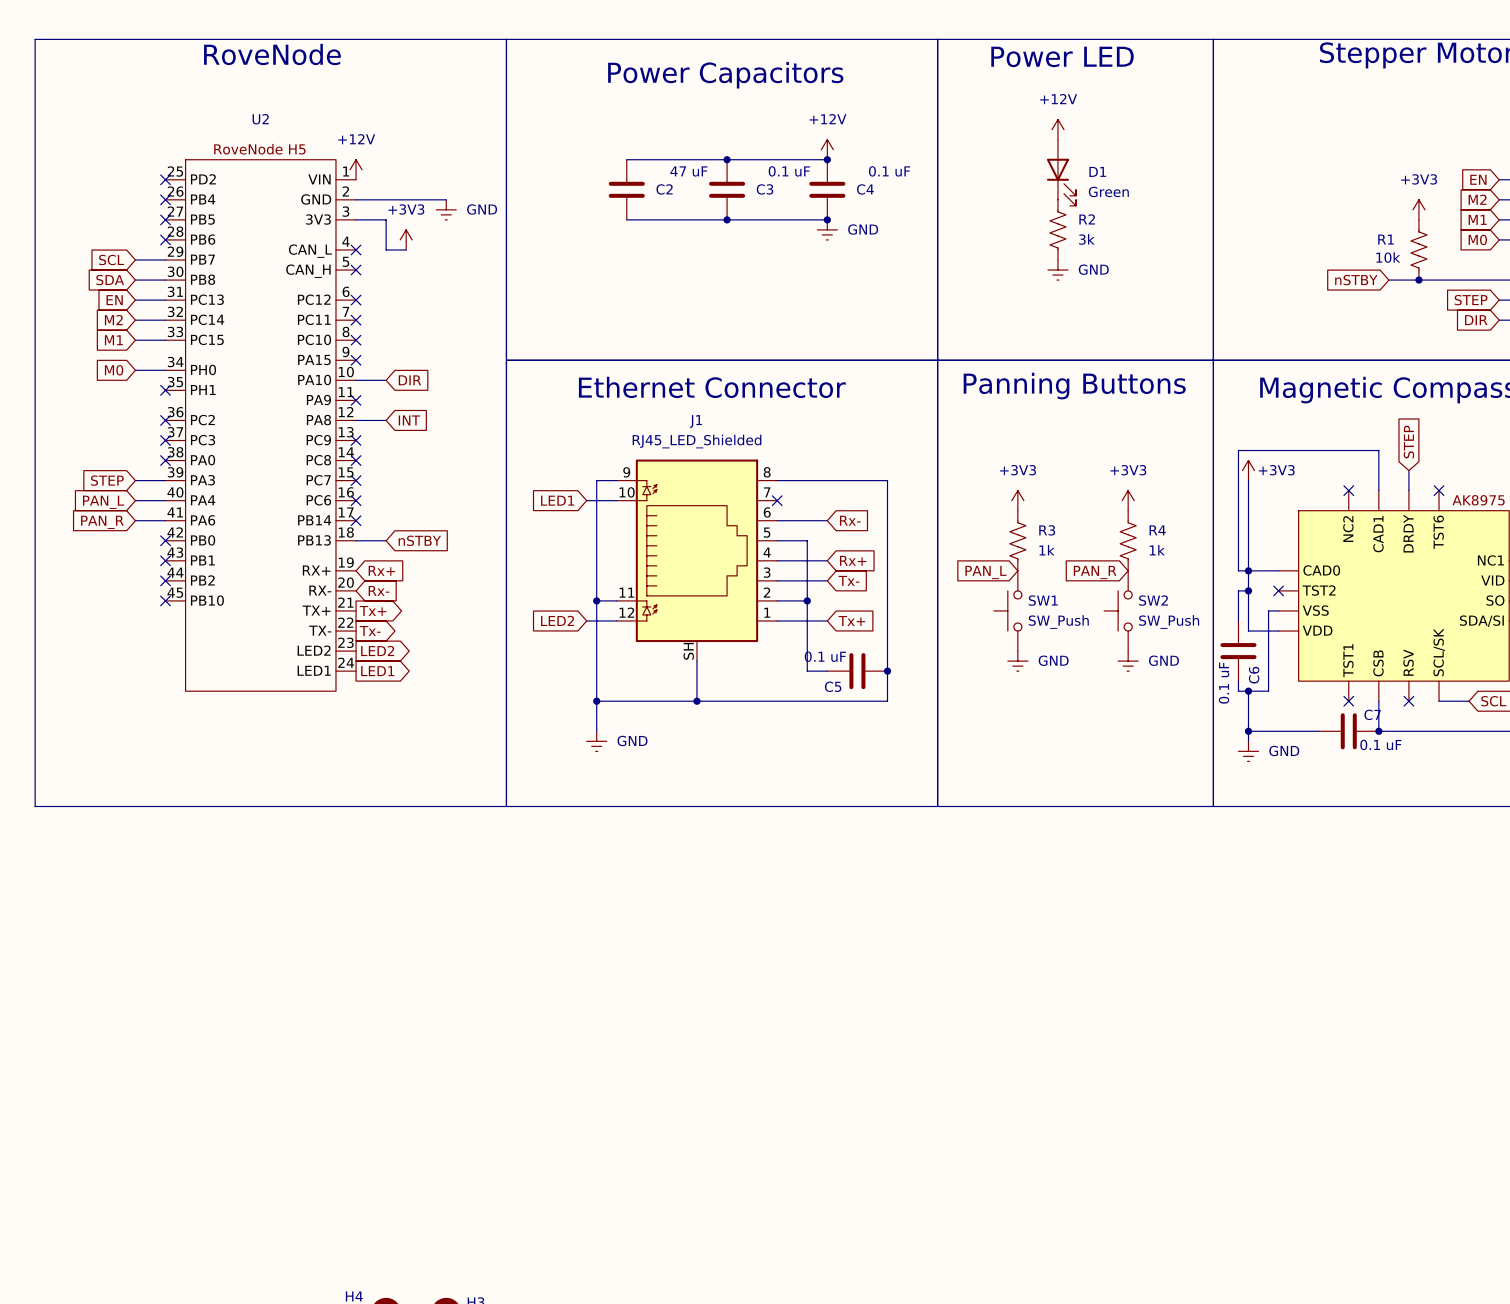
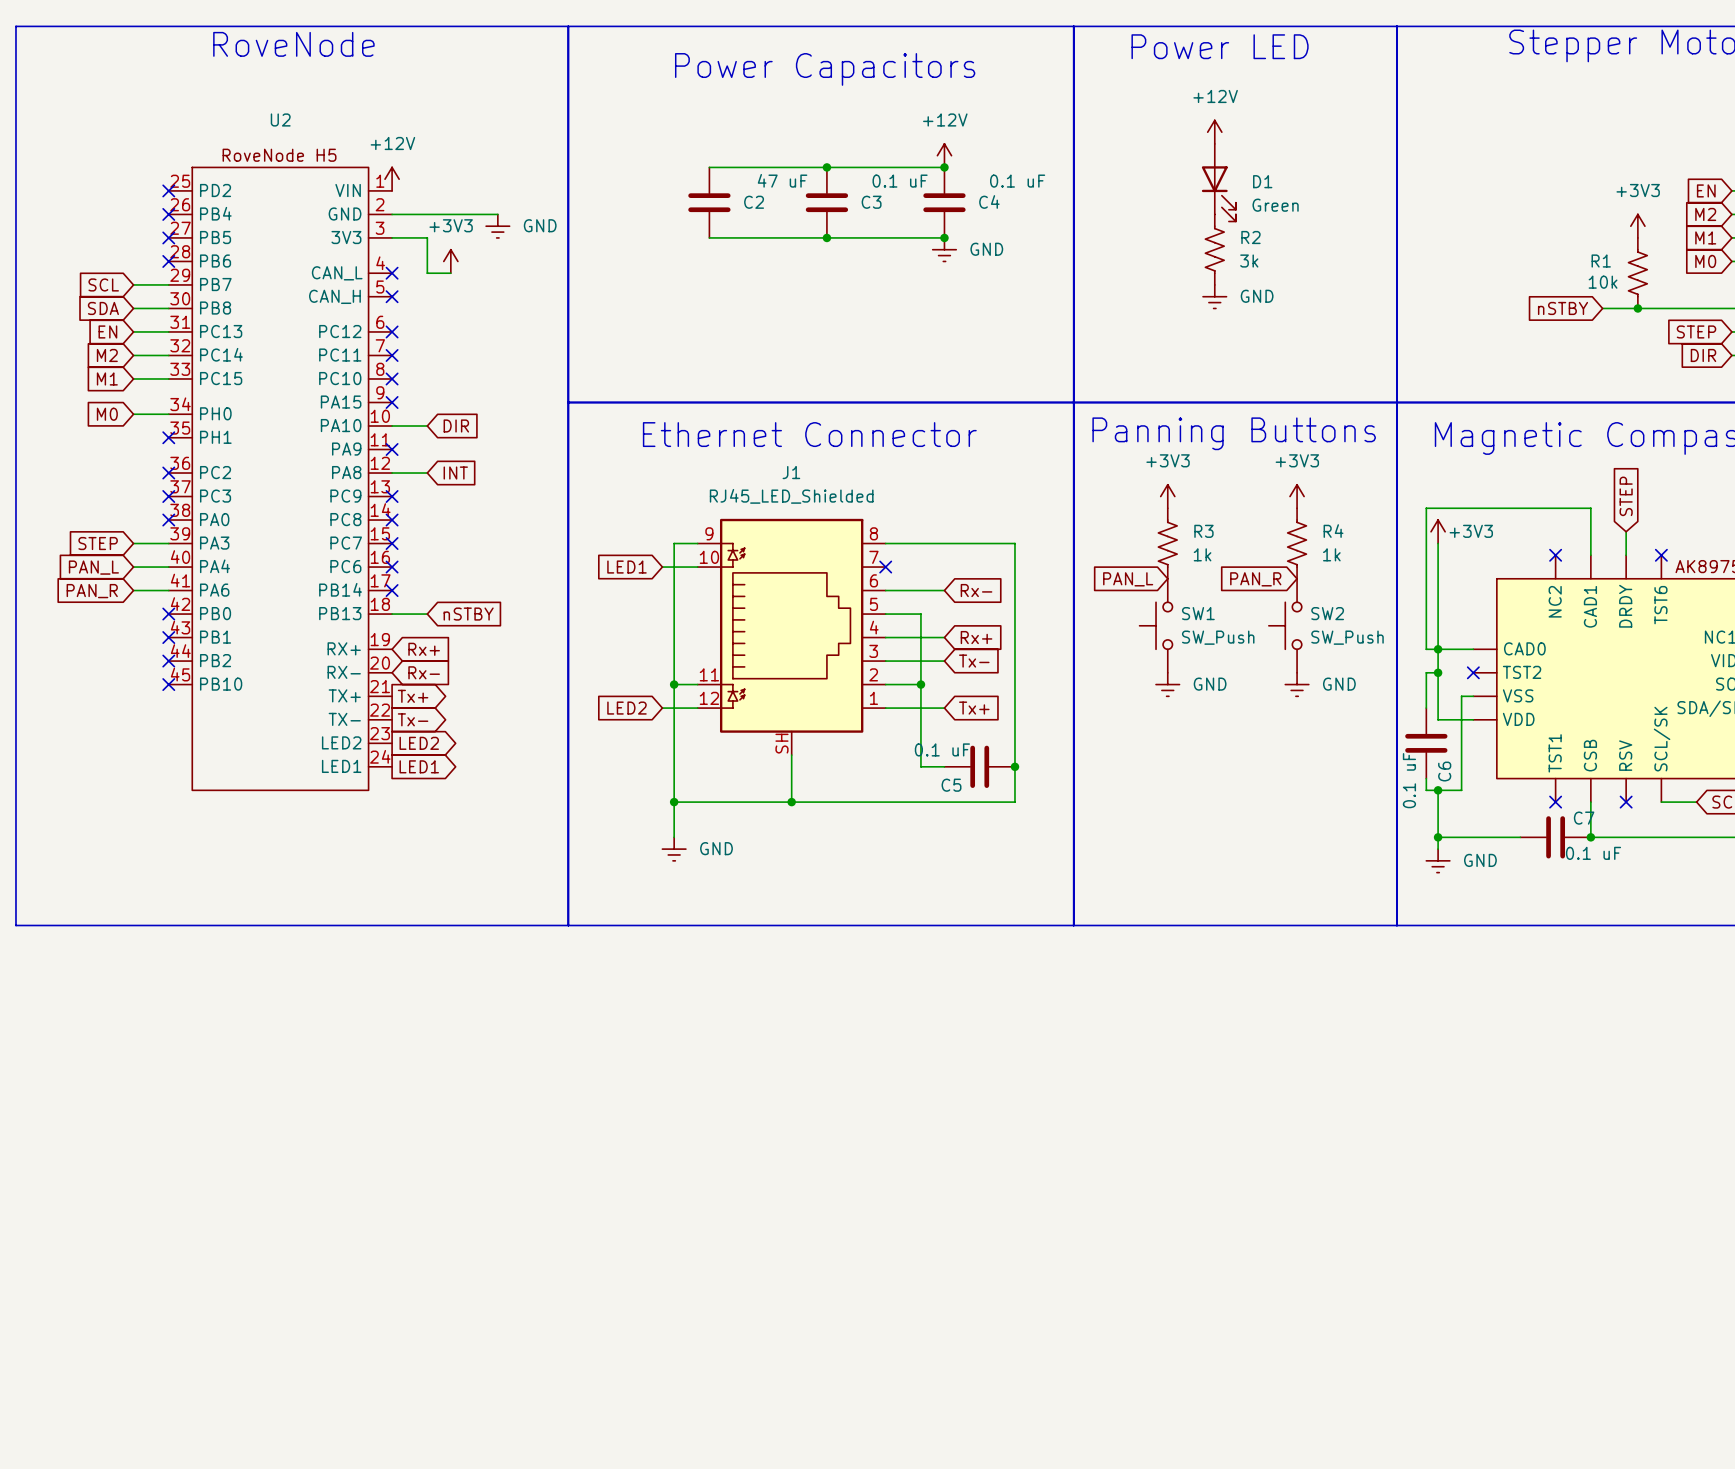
power symbol position: +3V3 (1017, 500) -> +3V3 (1167, 496)
power symbol position: +3V3 (1128, 500) -> +3V3 (1297, 496)
R3 position: (1017, 540) -> (1167, 543)
R4 position: (1128, 540) -> (1297, 543)
global label position: PAN_L (985, 572) -> PAN_L (1128, 579)
global label position: PAN_R (1095, 572) -> PAN_R (1255, 579)
SW1 position: (1007, 610) -> (1156, 625)
SW2 position: (1118, 610) -> (1285, 625)
power symbol position: GND (1017, 661) -> GND (1167, 684)
power symbol position: GND (1128, 661) -> GND (1297, 684)

